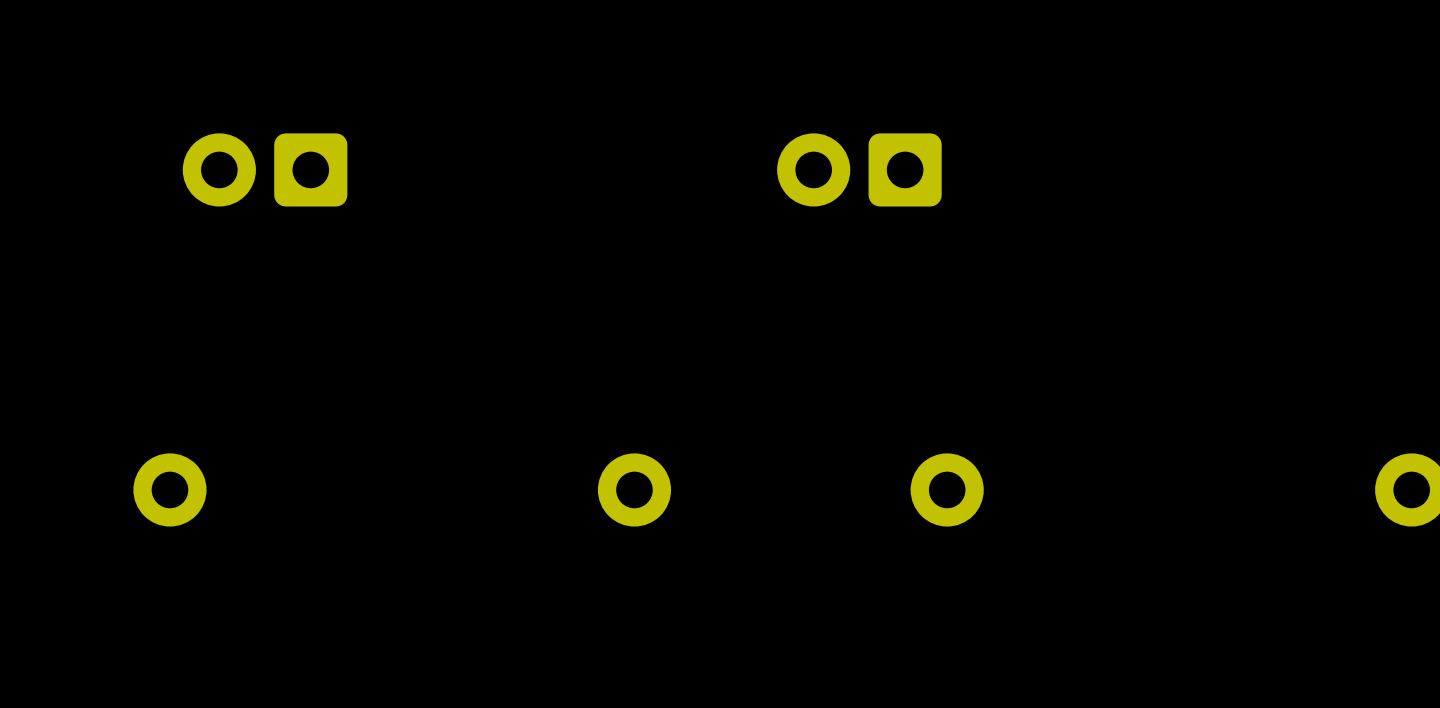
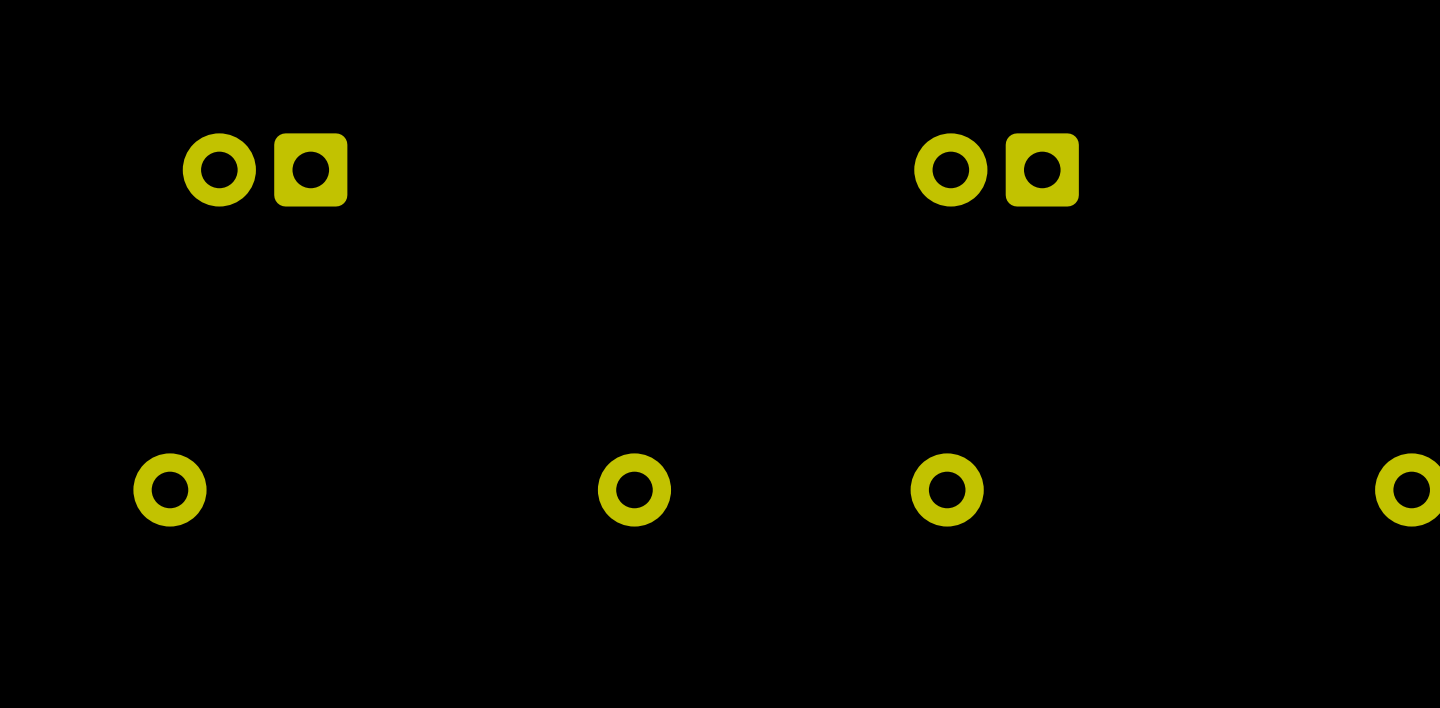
part position: (859, 169) -> (996, 169)

